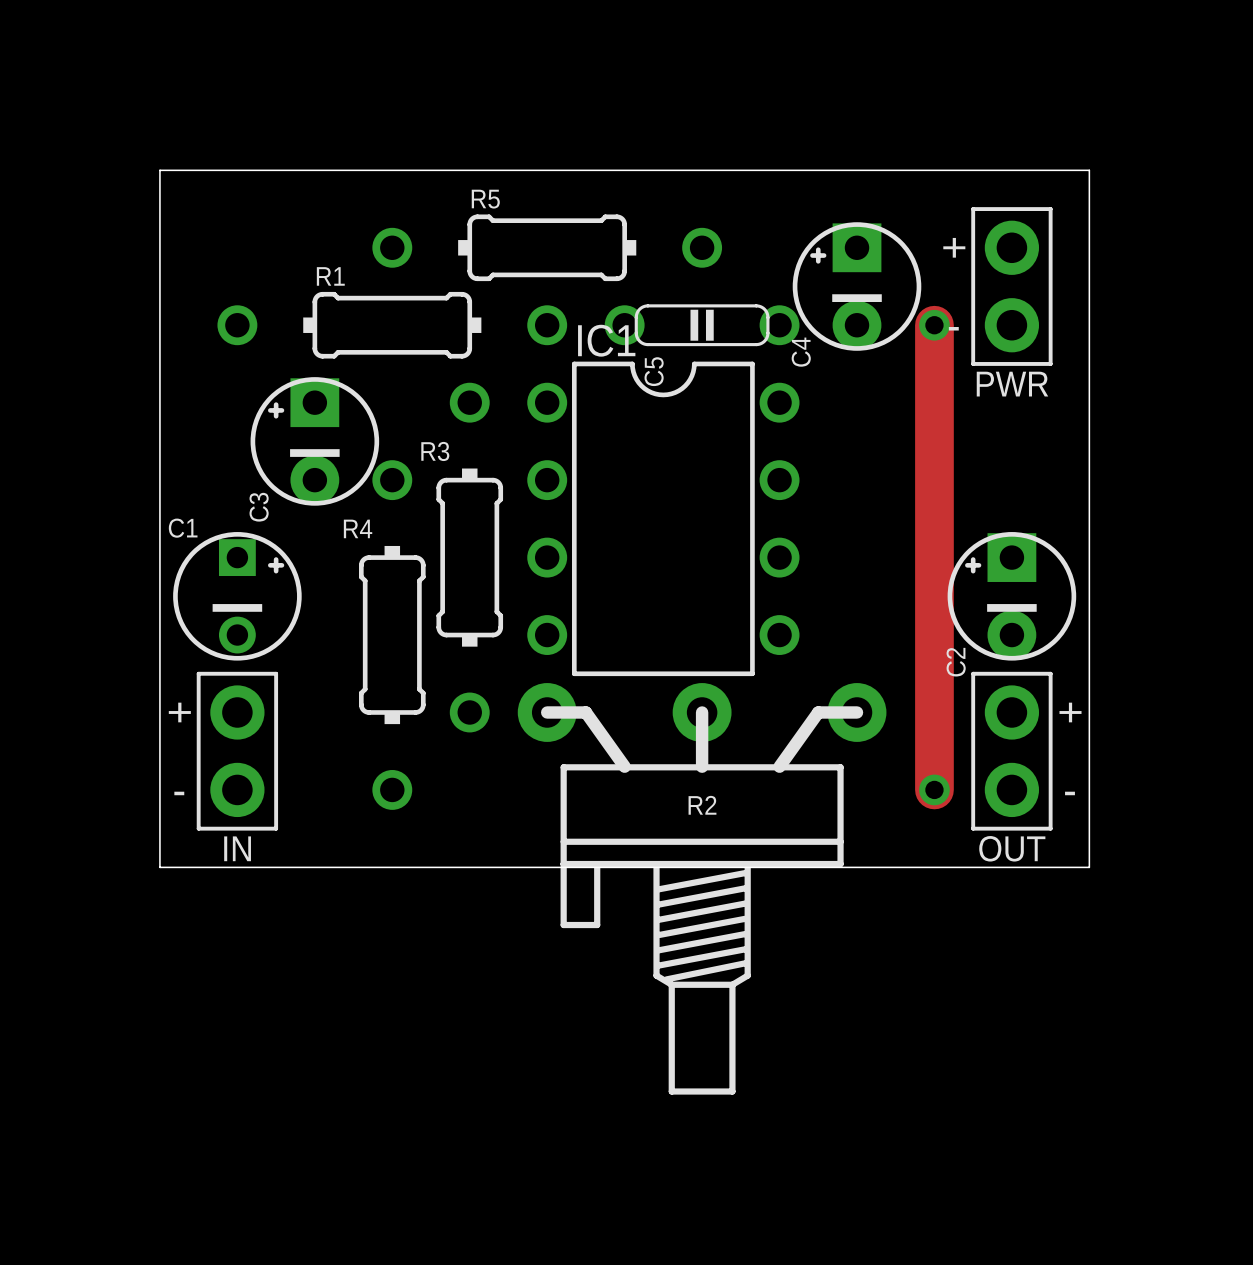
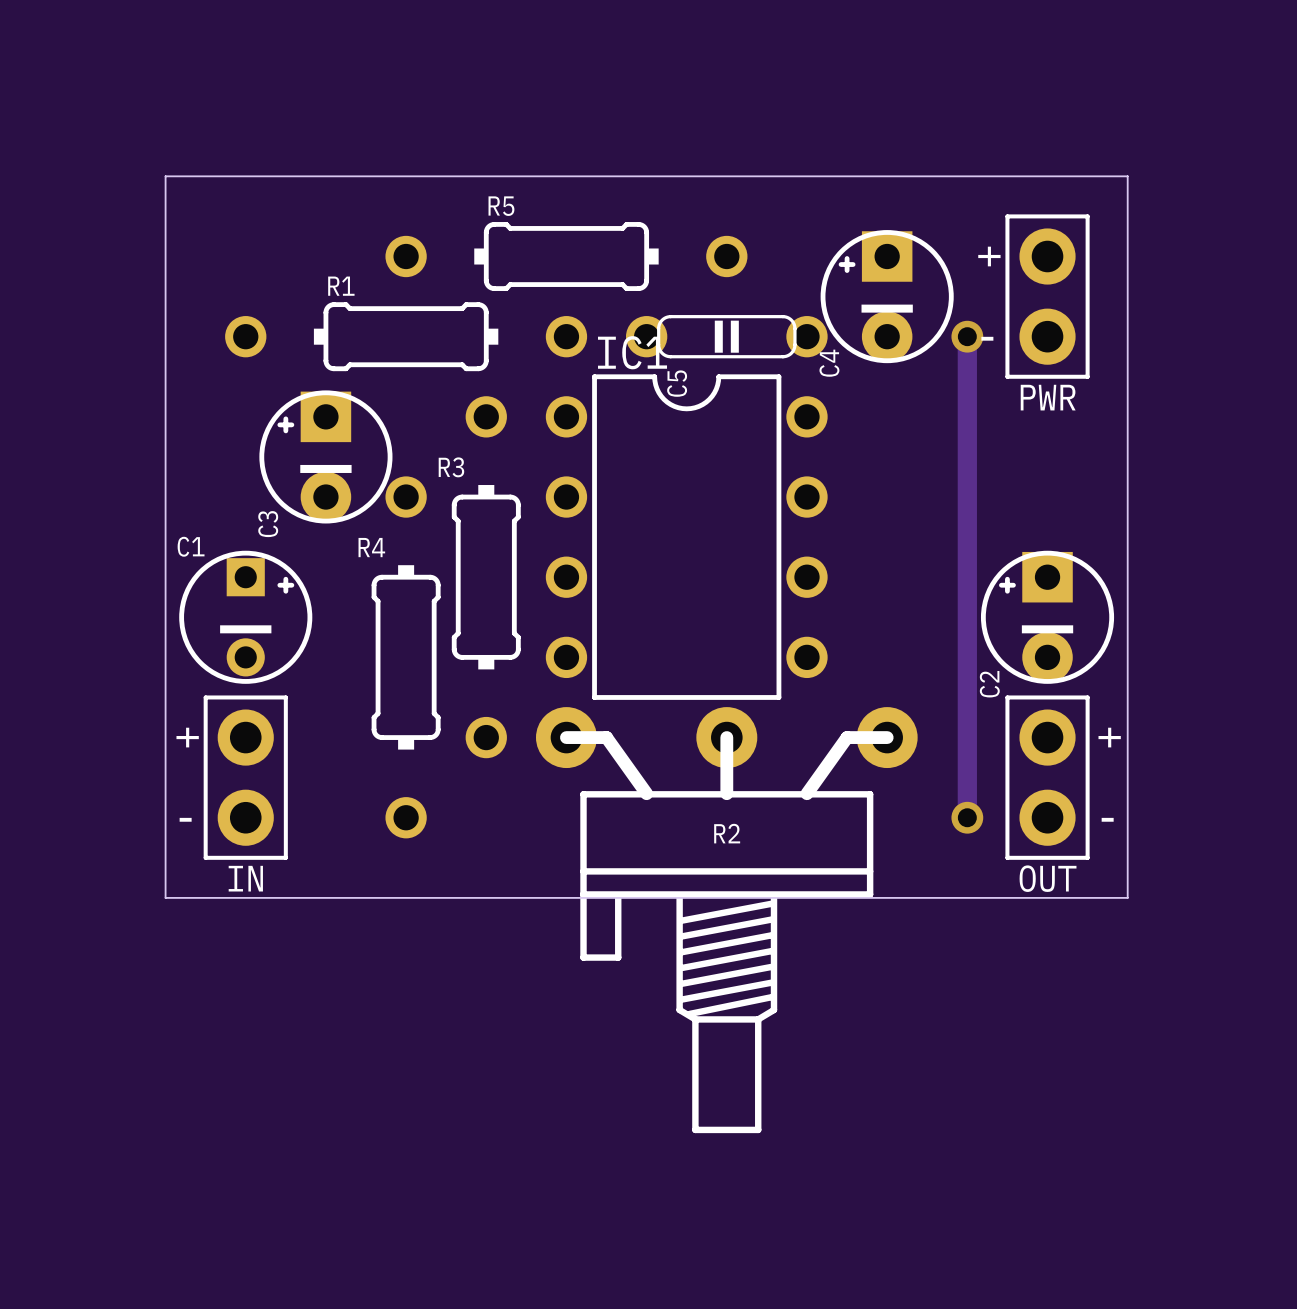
track width: thick (934, 325) (934, 789) -> thin (967, 336) (967, 817)

